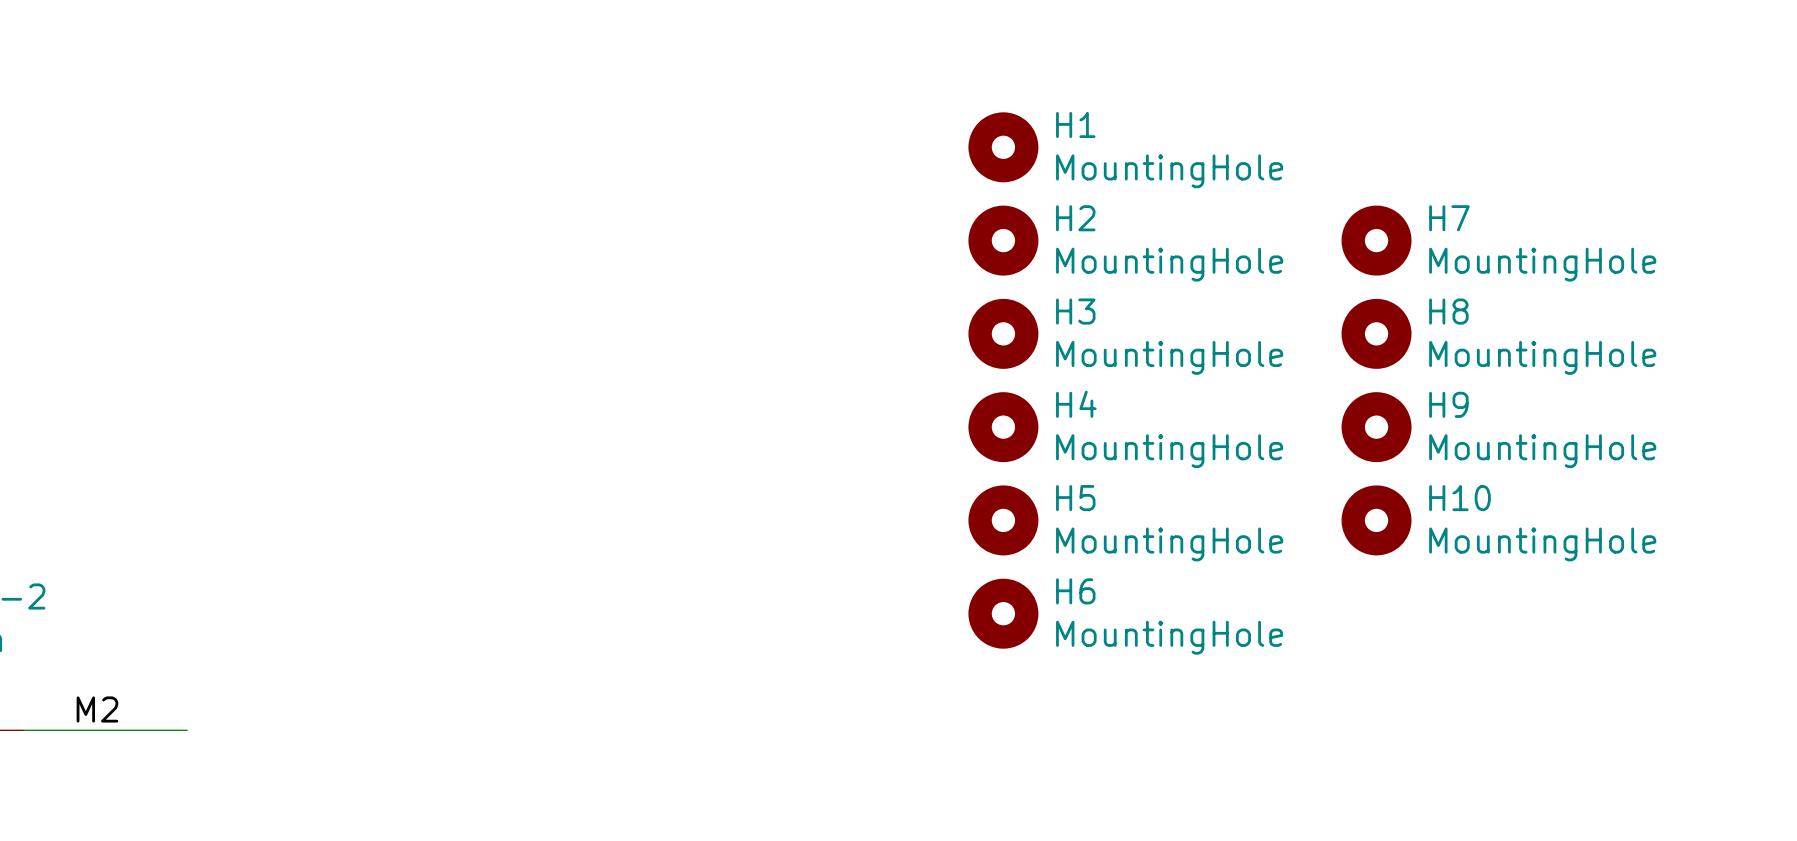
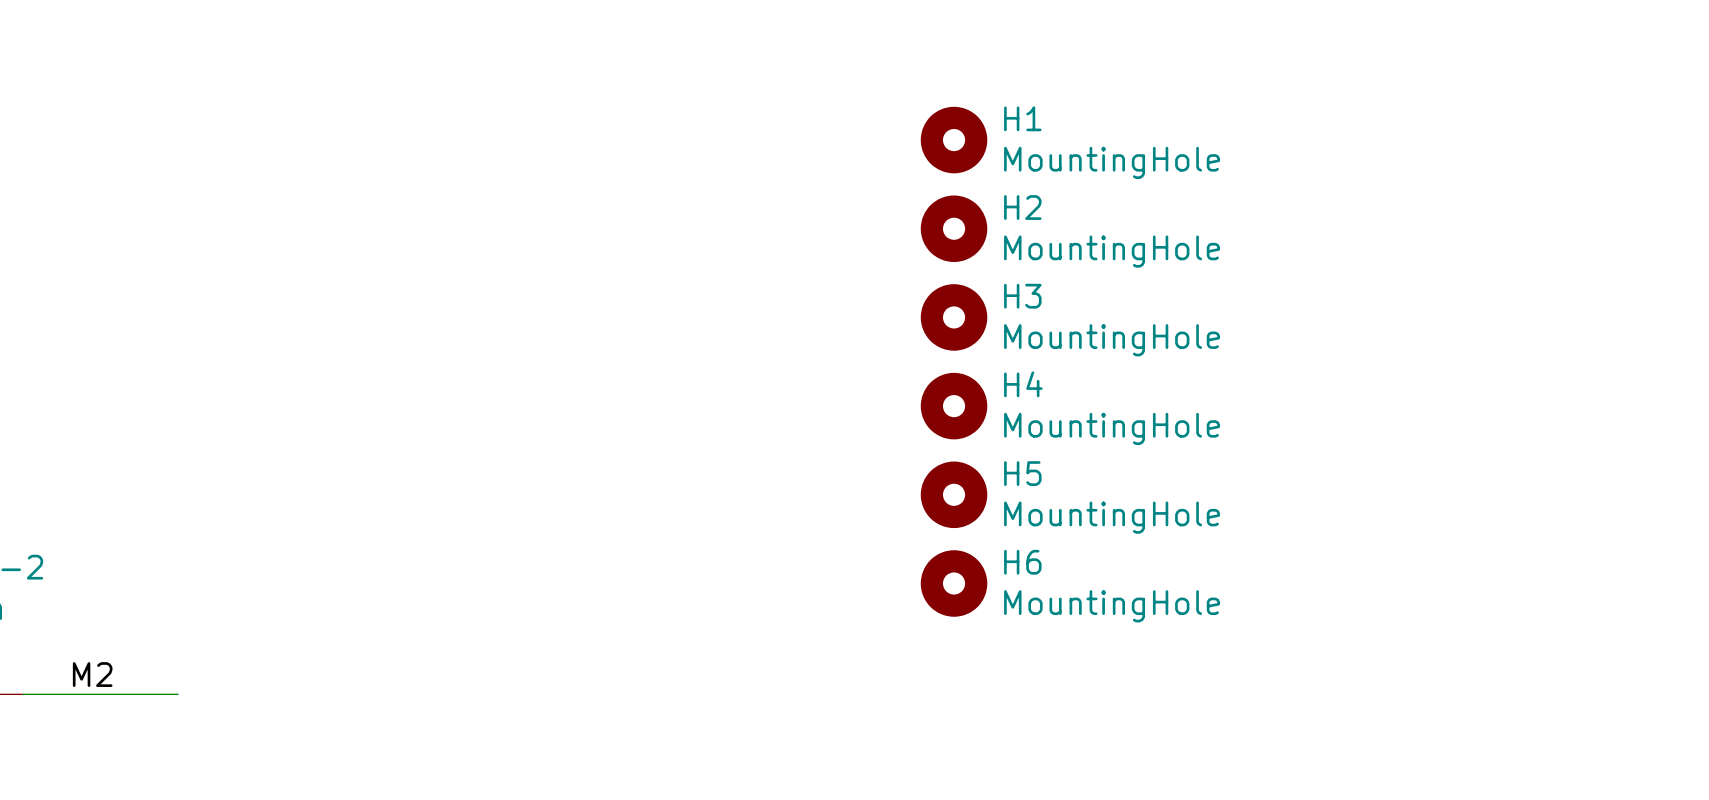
H7: MountingHole (1376, 240) -> none
H8: MountingHole (1376, 333) -> none
H9: MountingHole (1376, 427) -> none
H10: MountingHole (1376, 520) -> none

